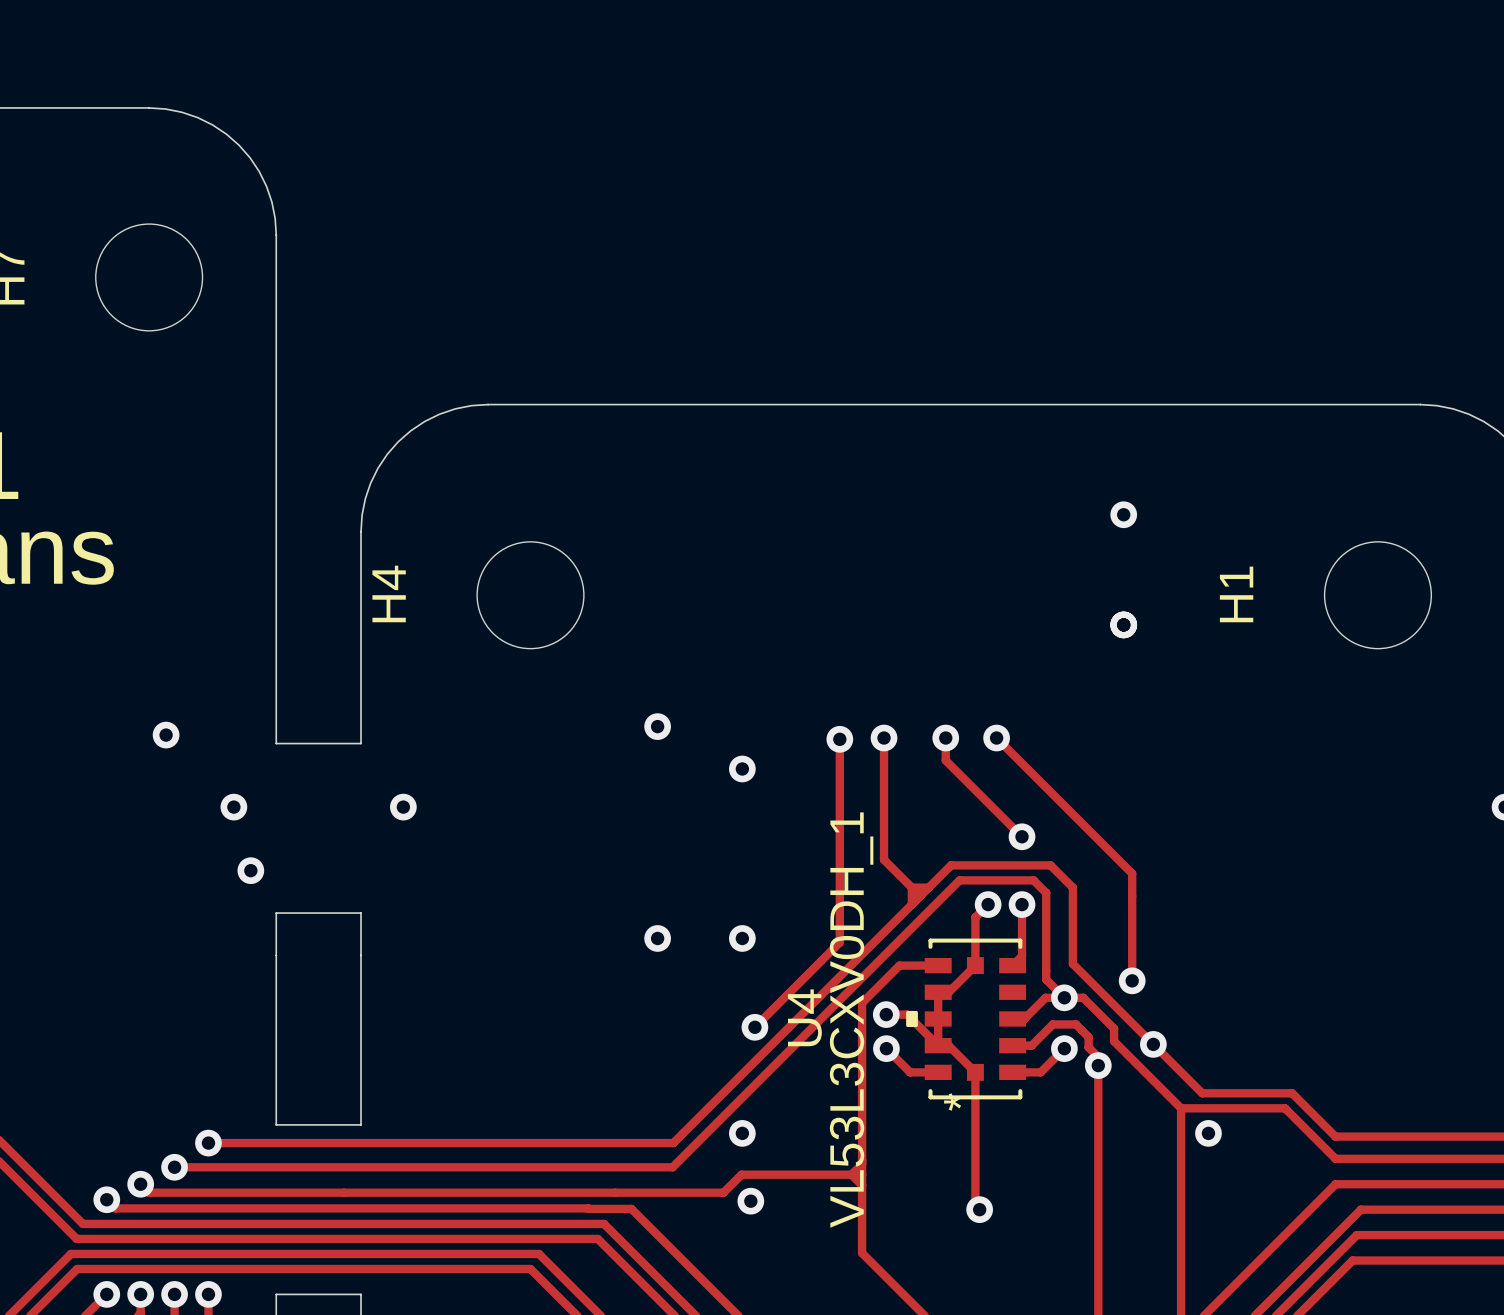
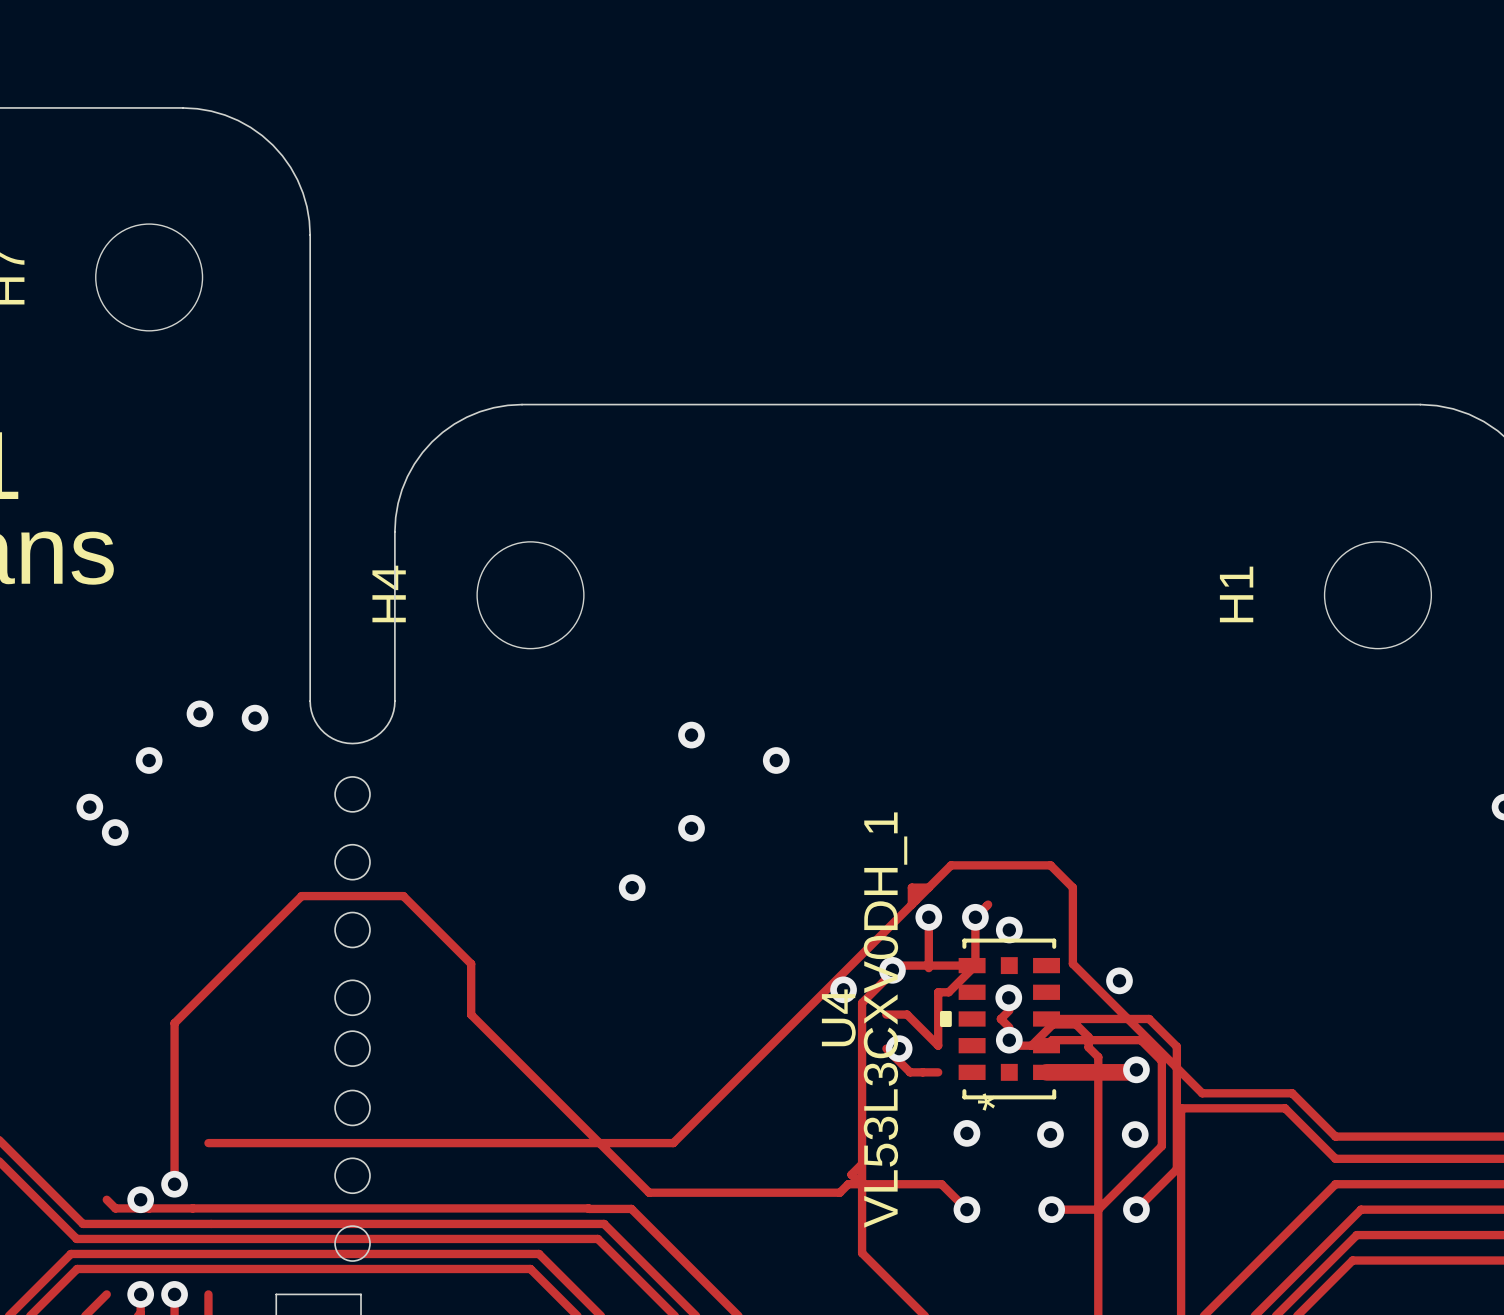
board edge: (149, 107) (165, 109) (197, 117) (226, 134) (239, 145) (259, 171) (271, 202) (276, 235) (276, 743) (361, 743) (362, 515) (370, 483) (387, 454) (410, 430) (439, 414) (471, 405) (522, 404) -> (149, 107) (183, 107) (211, 111) (238, 120) (250, 127) (272, 145) (282, 155) (290, 167) (303, 193) (309, 220) (310, 235) (310, 701) (312, 716) (317, 725) (332, 738) (352, 743) (372, 738) (387, 725) (393, 711) (395, 517) (402, 489) (414, 464) (422, 452) (442, 432) (466, 417) (493, 407) (522, 404)
via: (1123, 514) -> none
via: (1123, 624) -> none
via: none -> (199, 713)
via: none -> (255, 718)
via: (657, 726) -> none
via position: (166, 735) -> (149, 760)
via: none -> (691, 735)
track: (884, 738) (884, 859) (920, 896) -> none
via: (884, 738) -> none
track: (945, 738) (945, 760) (1022, 836) -> none
via: (945, 738) -> none
track: (996, 738) (1132, 873) (1132, 980) -> none
via: (996, 738) -> none
track: (839, 739) (839, 942) (754, 1027) -> none
via: (839, 739) -> none
via: none -> (776, 760)
via: (742, 768) -> none
round board edge: none -> [334, 776, 371, 813]
via: none -> (89, 807)
via: (233, 807) -> none
via: (403, 807) -> none
via: none -> (691, 828)
via: none -> (115, 832)
via: (1022, 836) -> none
round board edge: none -> [334, 843, 371, 881]
via: (250, 870) -> none
via: (988, 904) -> none
track: (1022, 904) (1022, 956) (1012, 965) -> none
via: (1022, 904) -> none
round board edge: none -> [334, 911, 371, 949]
board edge: (276, 913) (361, 913) (361, 1124) (276, 1124) (276, 913) -> none
track: none -> (928, 917) (928, 968)
via: none -> (928, 917)
via: none -> (975, 917)
via: none -> (1009, 930)
via position: (657, 938) -> (632, 887)
via: (742, 938) -> none
track: none -> (938, 965) (972, 965)
via: none -> (892, 970)
round board edge: none -> [334, 979, 371, 1017]
via position: (1132, 980) -> (1119, 980)
via: none -> (843, 989)
via: none -> (1008, 997)
track: (1064, 997) (1046, 979) (1046, 892) (1033, 880) (959, 880) (672, 1167) (174, 1167) -> none
via: (1064, 997) -> none
track: none -> (1009, 1010) (1000, 1018) (1009, 1027)
via: (886, 1014) -> none
U4 position: (966, 1018) -> (1000, 1018)
track: (1012, 1018) (1024, 1018) (1045, 997) (1083, 997) (1114, 1028) (1114, 1041) (1181, 1108) -> none
track: none -> (1046, 1018) (1149, 1018) (1176, 1046) (1176, 1169) (1136, 1209)
via: (754, 1027) -> none
round board edge: none -> [334, 1030, 371, 1067]
via: none -> (1009, 1040)
via position: (1153, 1044) -> (1136, 1069)
track: (938, 1045) (948, 1045) (975, 1072) (975, 1205) (979, 1209) -> none
track: none -> (1046, 1045) (1052, 1040) (1140, 1040) (1161, 1061) (1161, 1146) (1098, 1209) (1051, 1209)
via position: (886, 1048) -> (899, 1048)
track: (1064, 1048) (1040, 1072) (1012, 1072) -> none
via: (1064, 1048) -> none
via: (1098, 1065) -> none
track: none -> (1136, 1069) (1133, 1072) (1046, 1072)
round board edge: none -> [334, 1089, 371, 1127]
via: (742, 1133) -> none
via: none -> (966, 1133)
via: (1208, 1133) -> none
via: none -> (1050, 1134)
via: none -> (1135, 1134)
via: (208, 1143) -> none
round board edge: none -> [334, 1157, 371, 1195]
via position: (174, 1167) -> (174, 1184)
track: (862, 1174) (741, 1174) (723, 1192) -> (966, 1209) (941, 1184) (848, 1184) (839, 1192) (723, 1192)
track: (140, 1184) (149, 1192) (649, 1192) -> (174, 1184) (174, 1023) (301, 896) (403, 896) (471, 963) (471, 1014) (649, 1192)
via position: (140, 1184) -> (140, 1199)
via: (106, 1199) -> none
via: (750, 1201) -> none
via position: (979, 1209) -> (966, 1209)
via: none -> (1051, 1209)
via: none -> (1136, 1209)
round board edge: none -> [334, 1225, 371, 1262]
via: (106, 1294) -> none
via: (208, 1294) -> none

